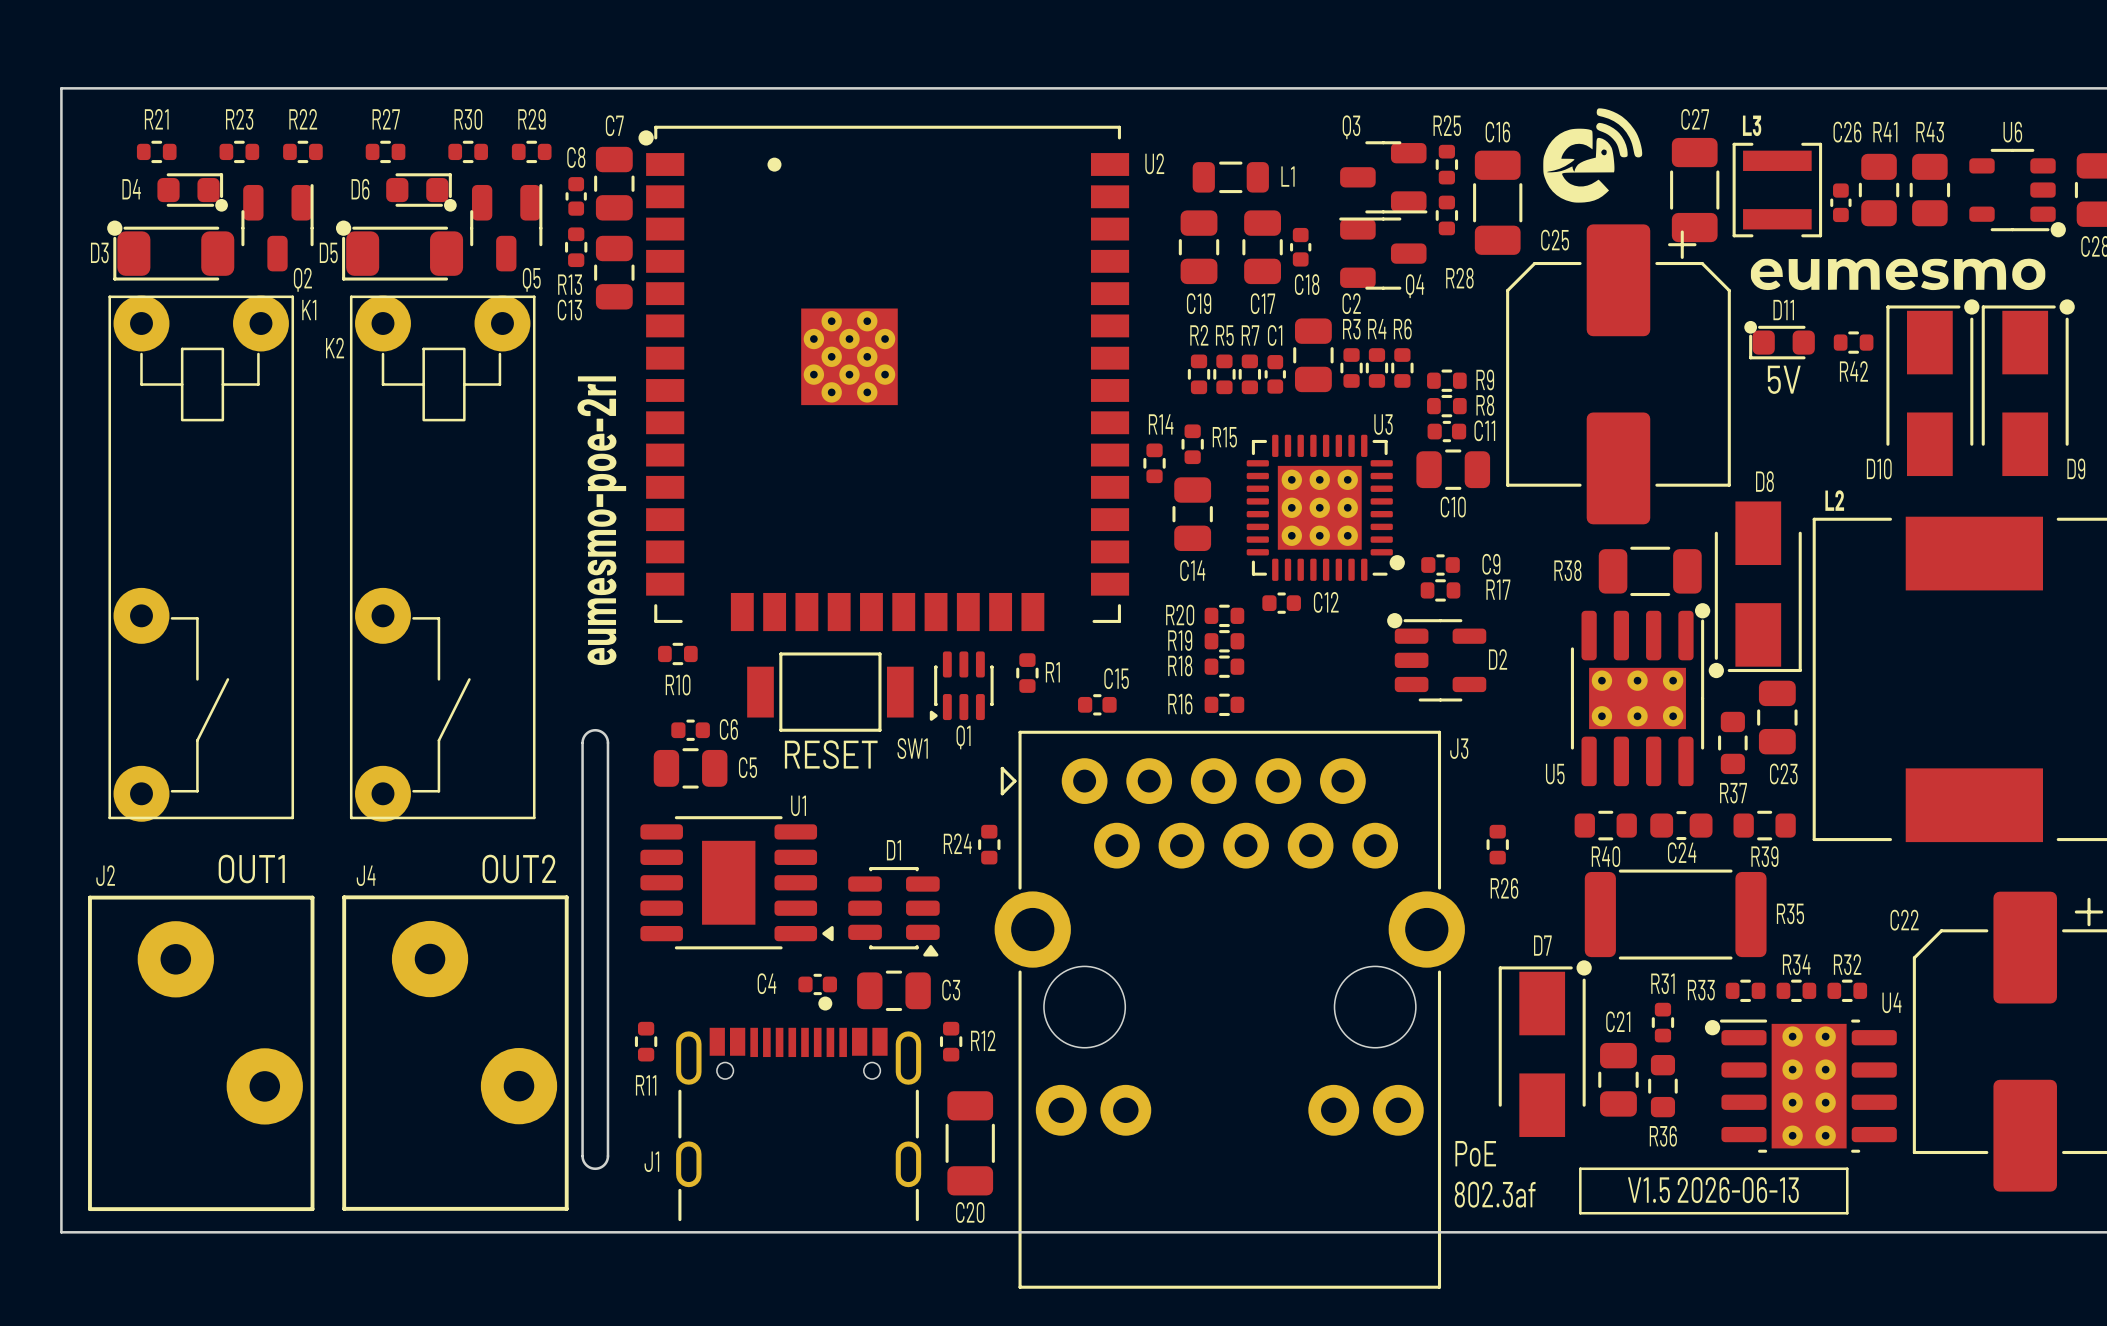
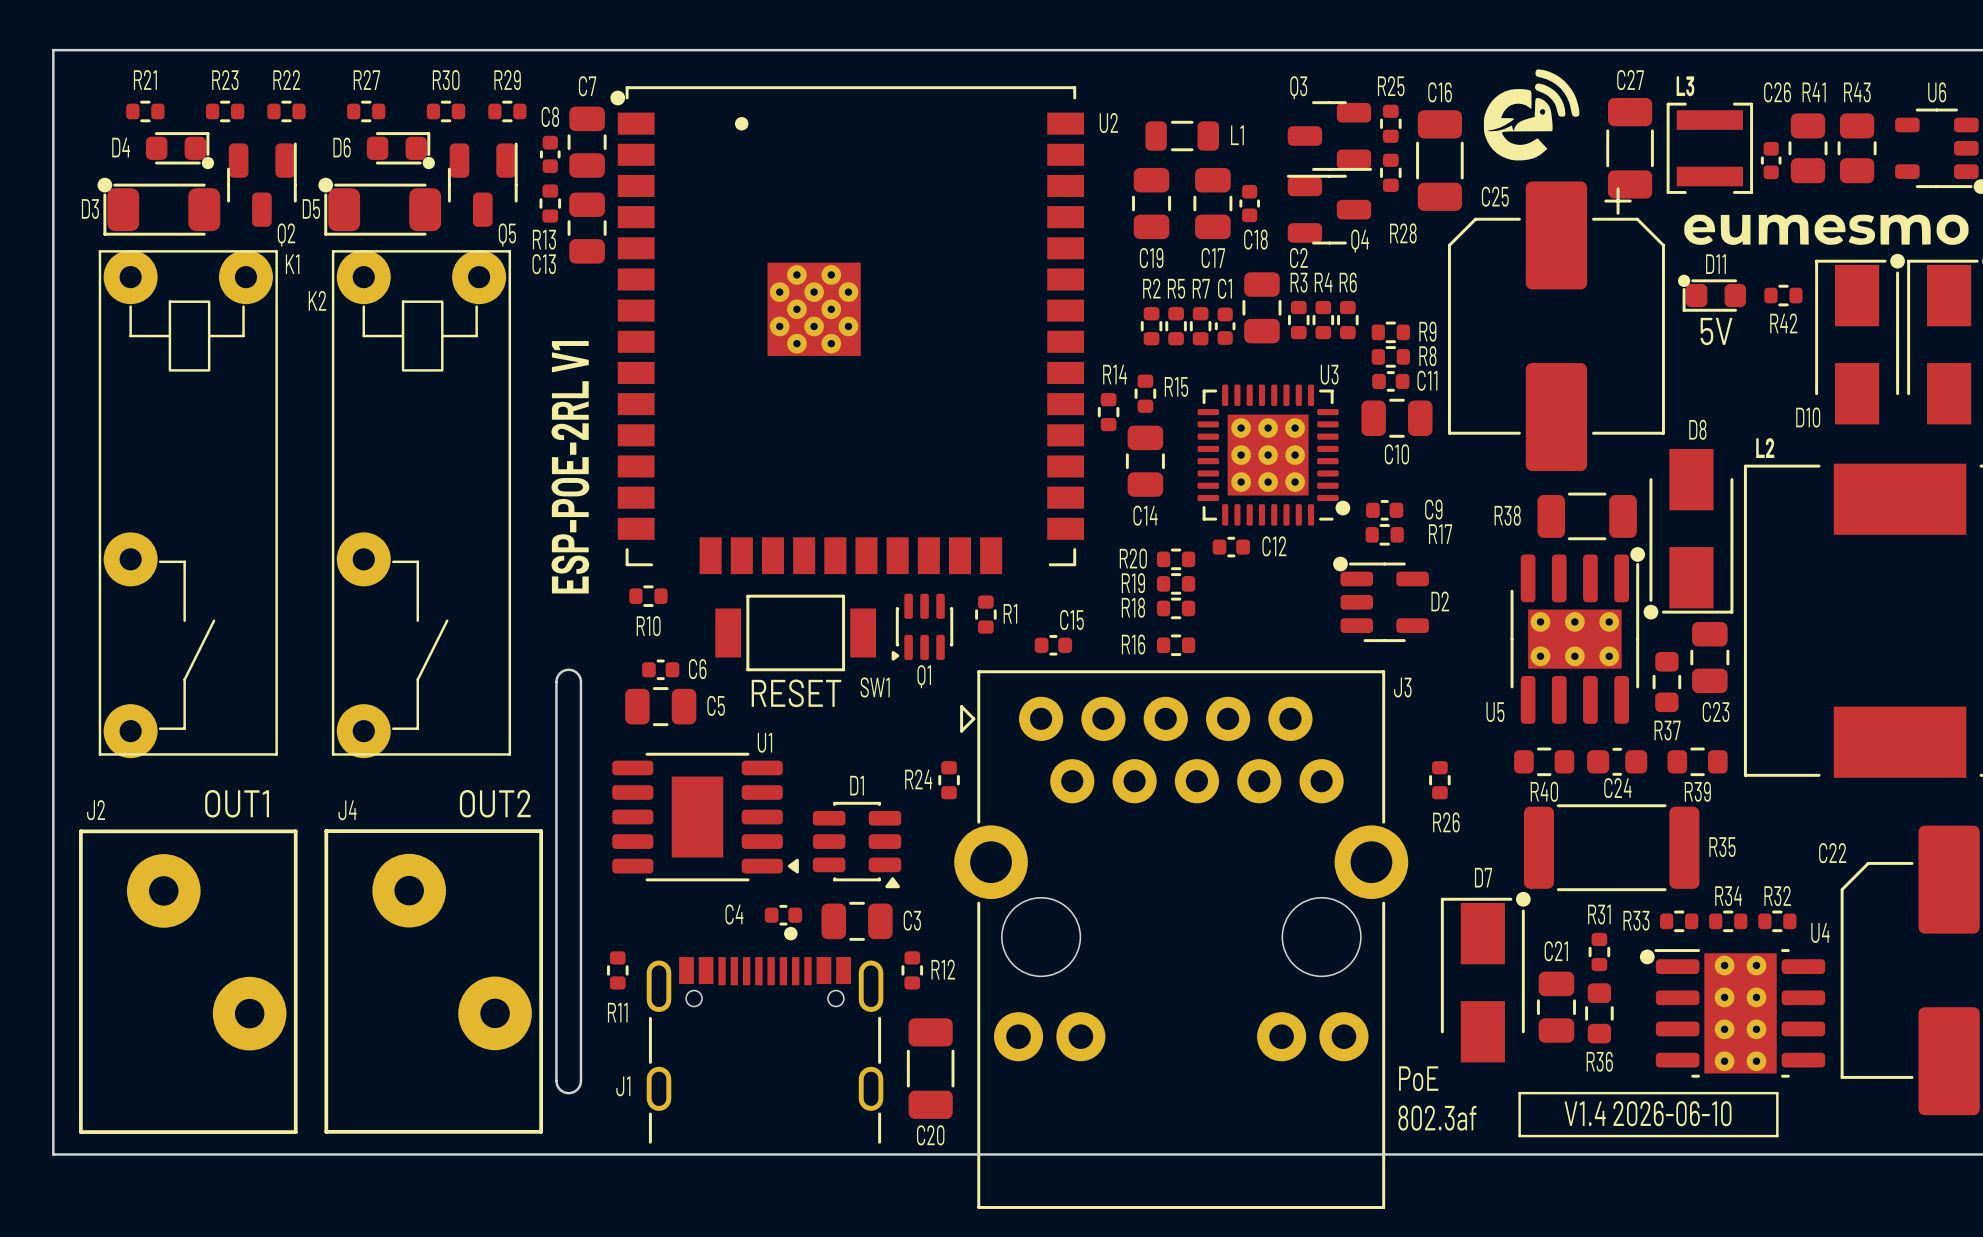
text: eumesmo-poe-2rl (601, 520) -> ESP-POE-2RL V1 (570, 467)
text: V1.5 2026-06-13 (1713, 1190) -> V1.4 2026-06-10 (1648, 1113)

